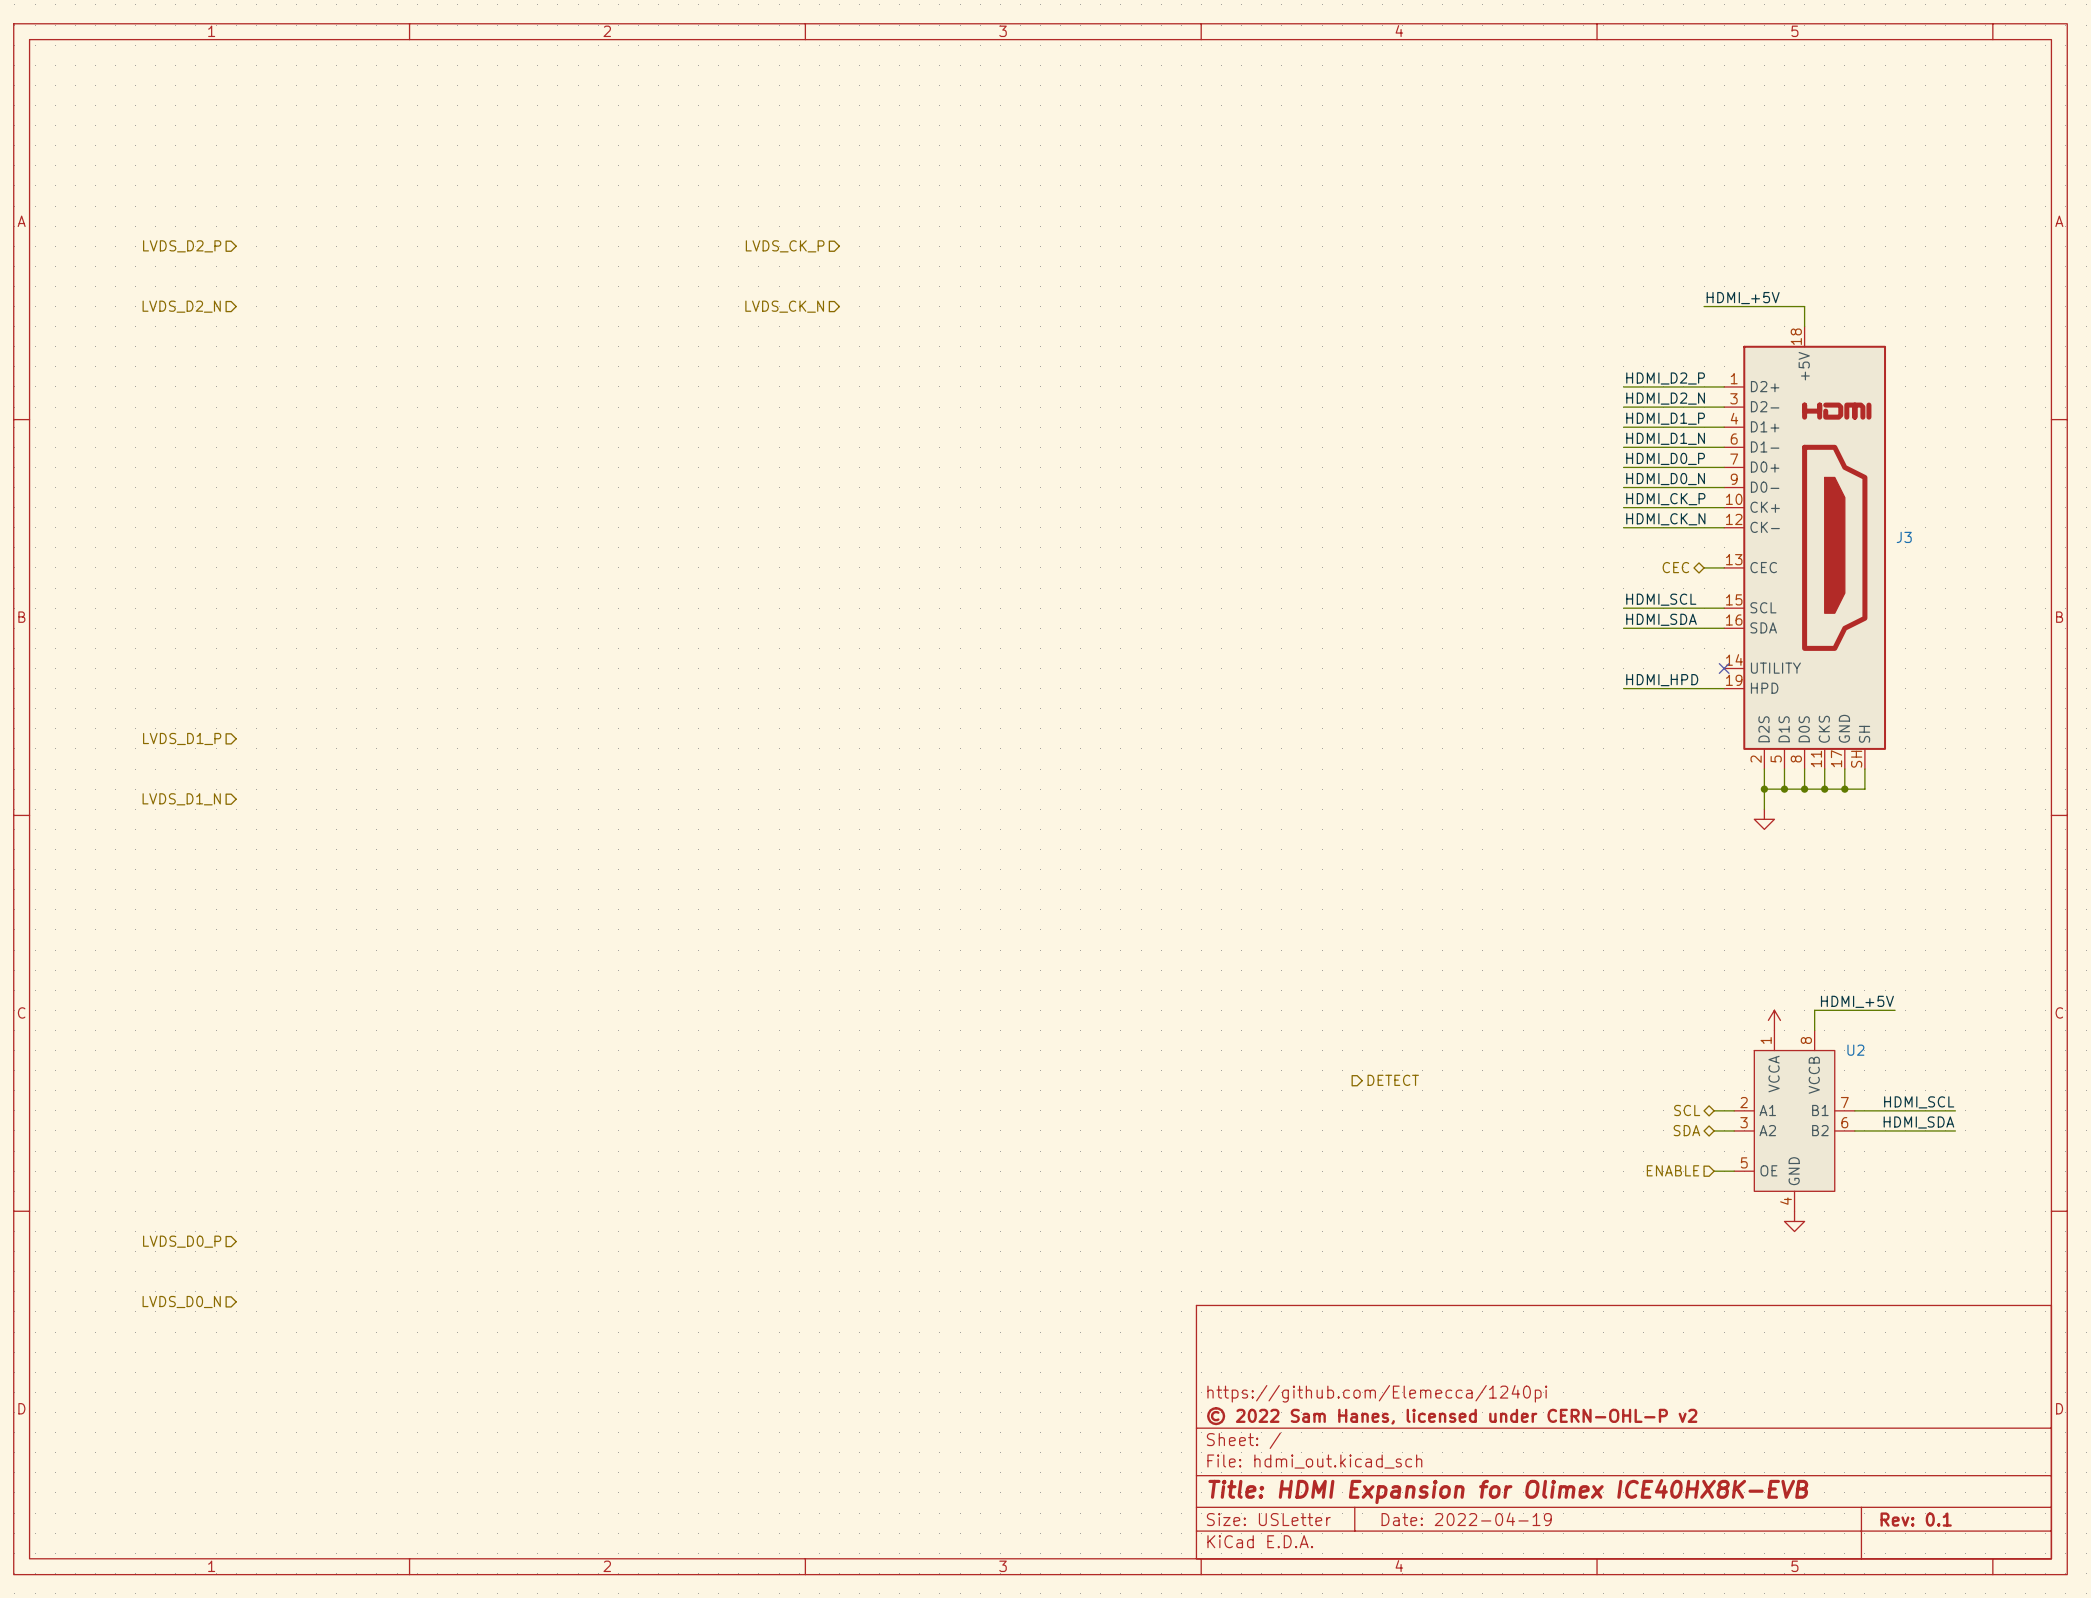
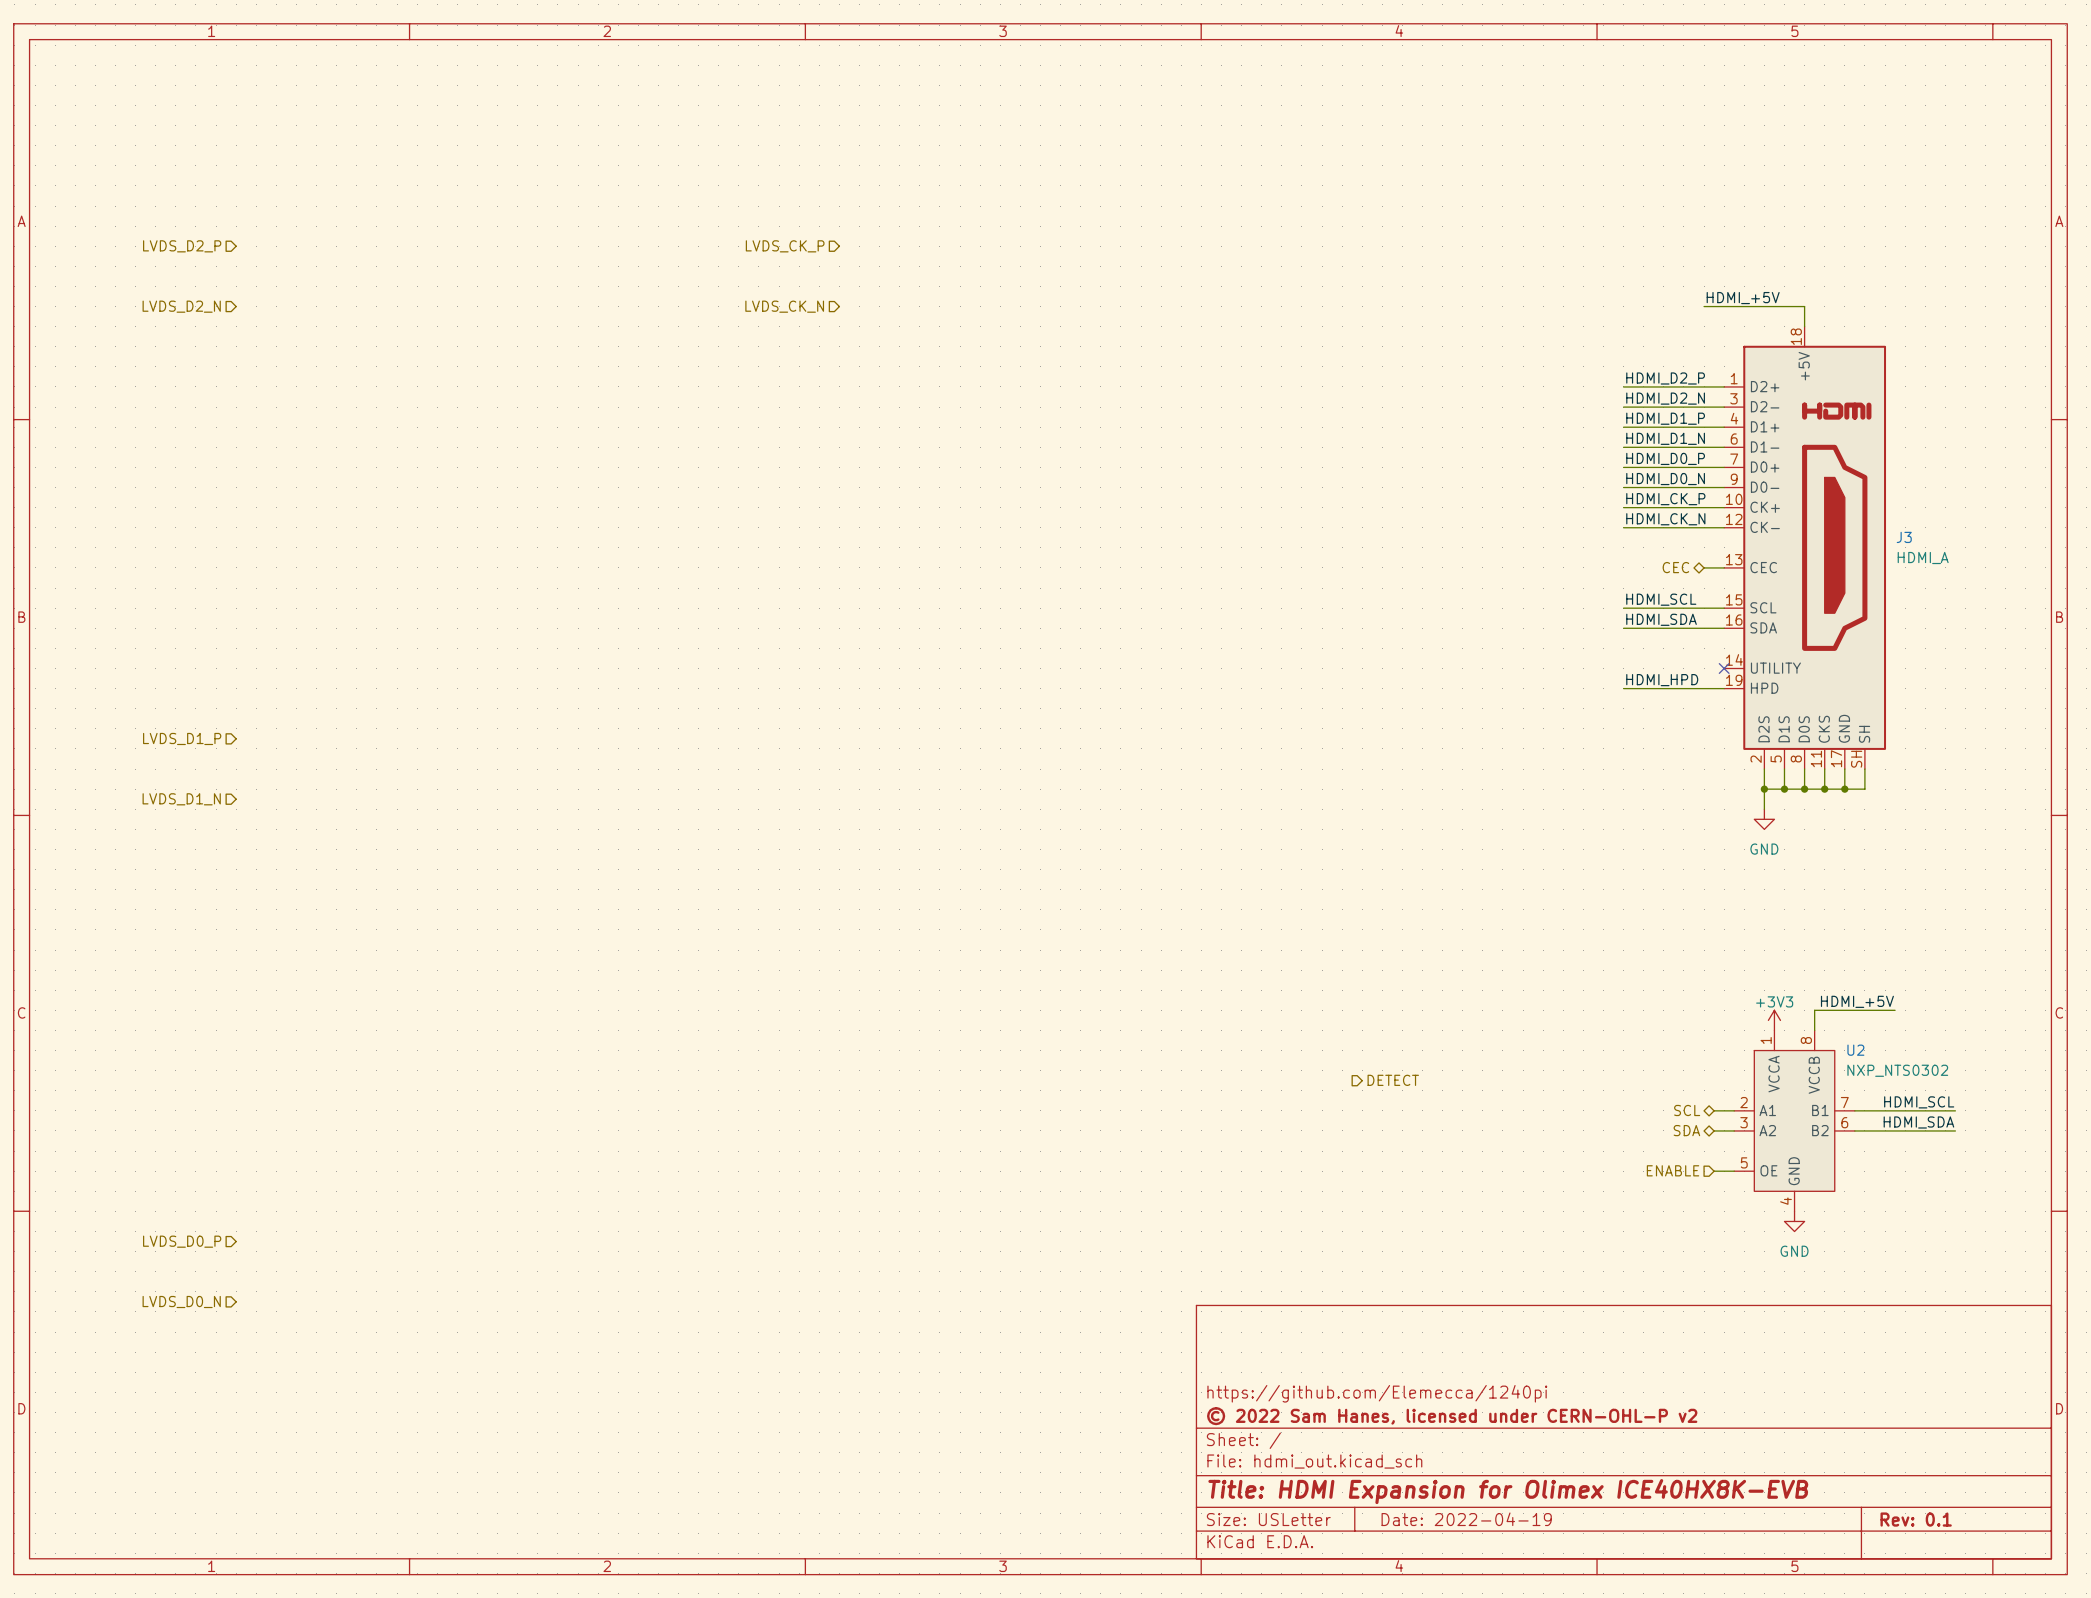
J3 value: none -> HDMI_A (1923, 558)
power symbol text: none -> GND (1764, 849)
power symbol text: none -> +3V3 (1774, 1001)
U2 value: none -> NXP_NTS0302 (1897, 1070)
power symbol text: none -> GND (1794, 1251)

